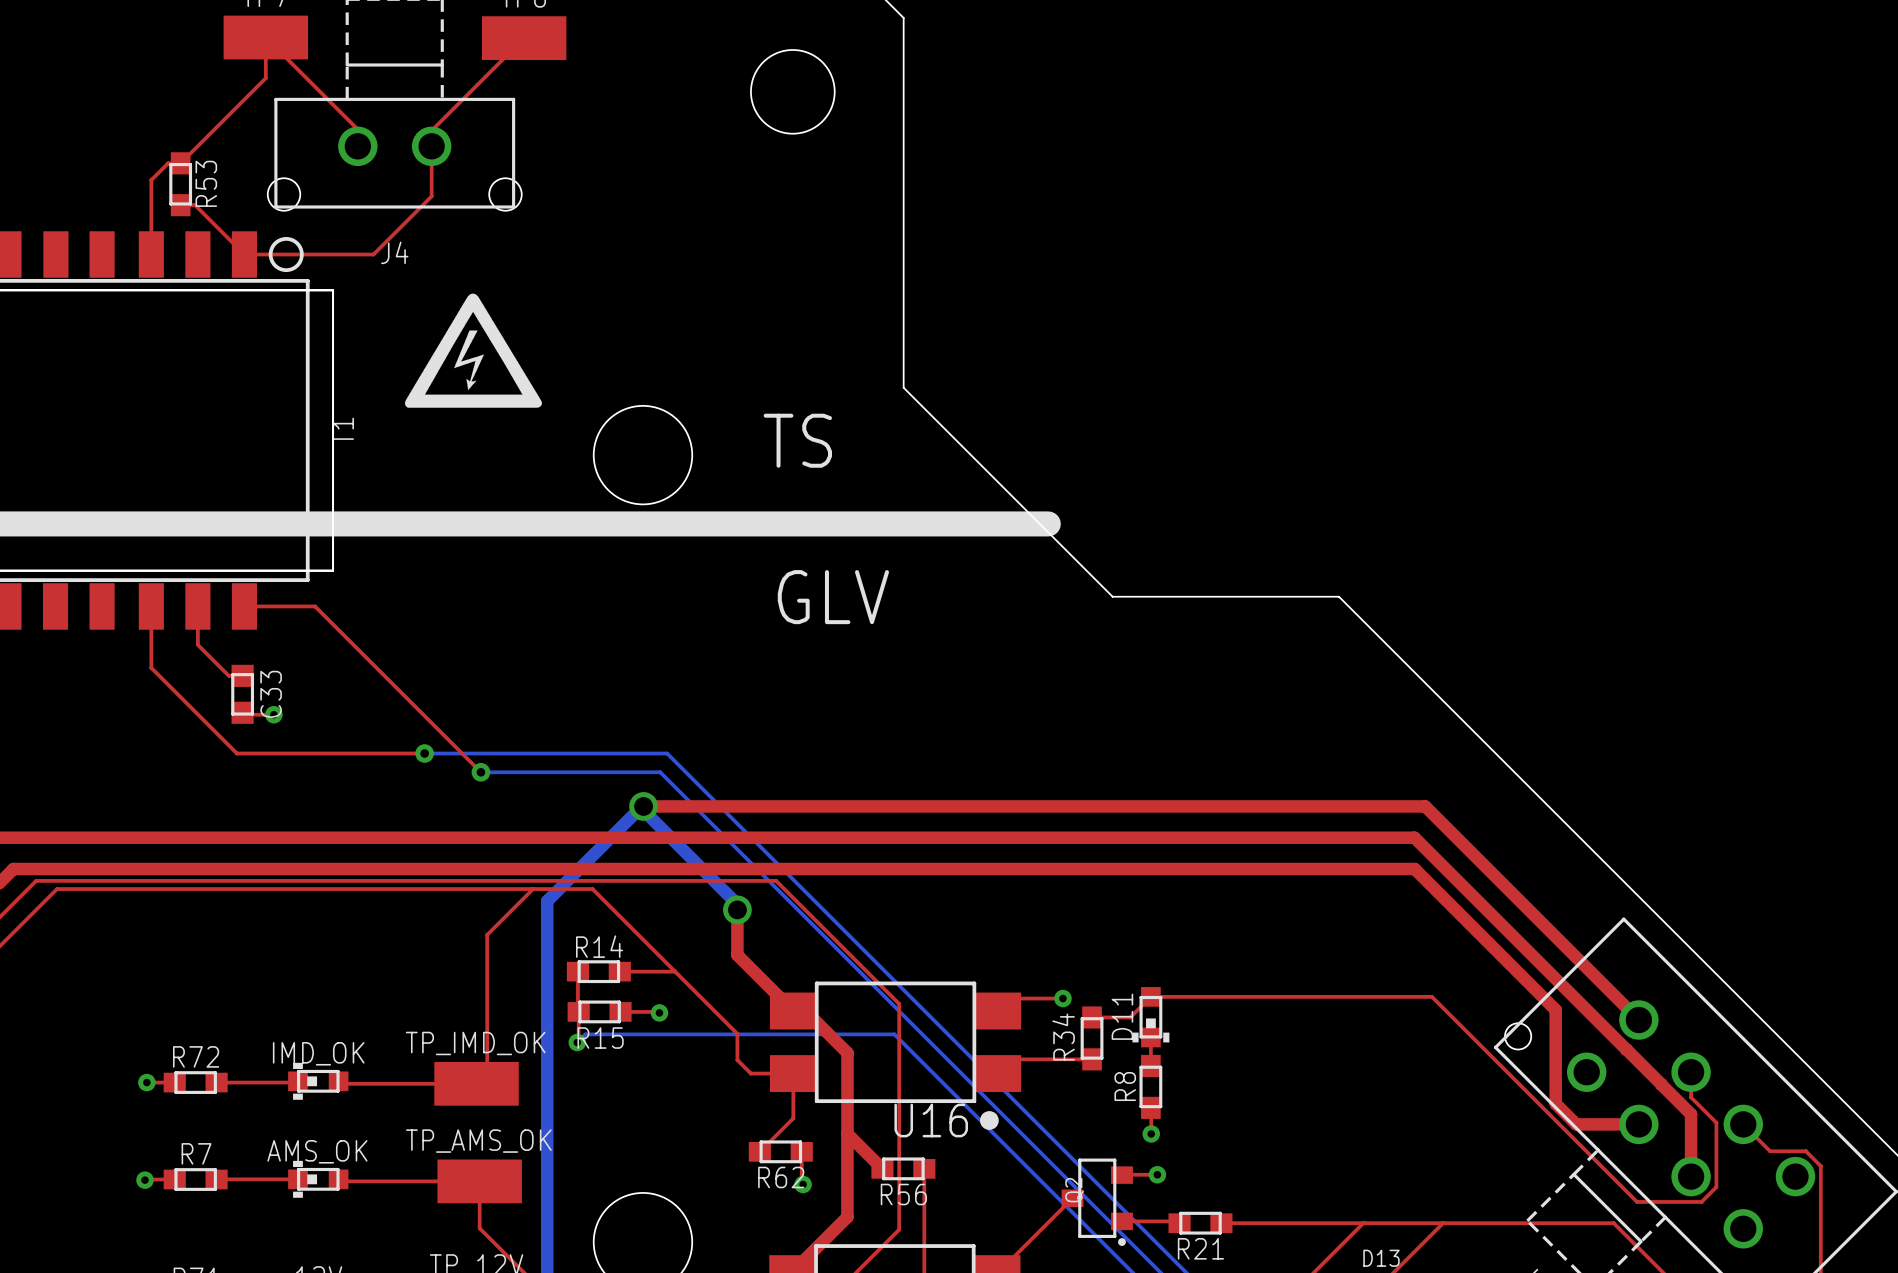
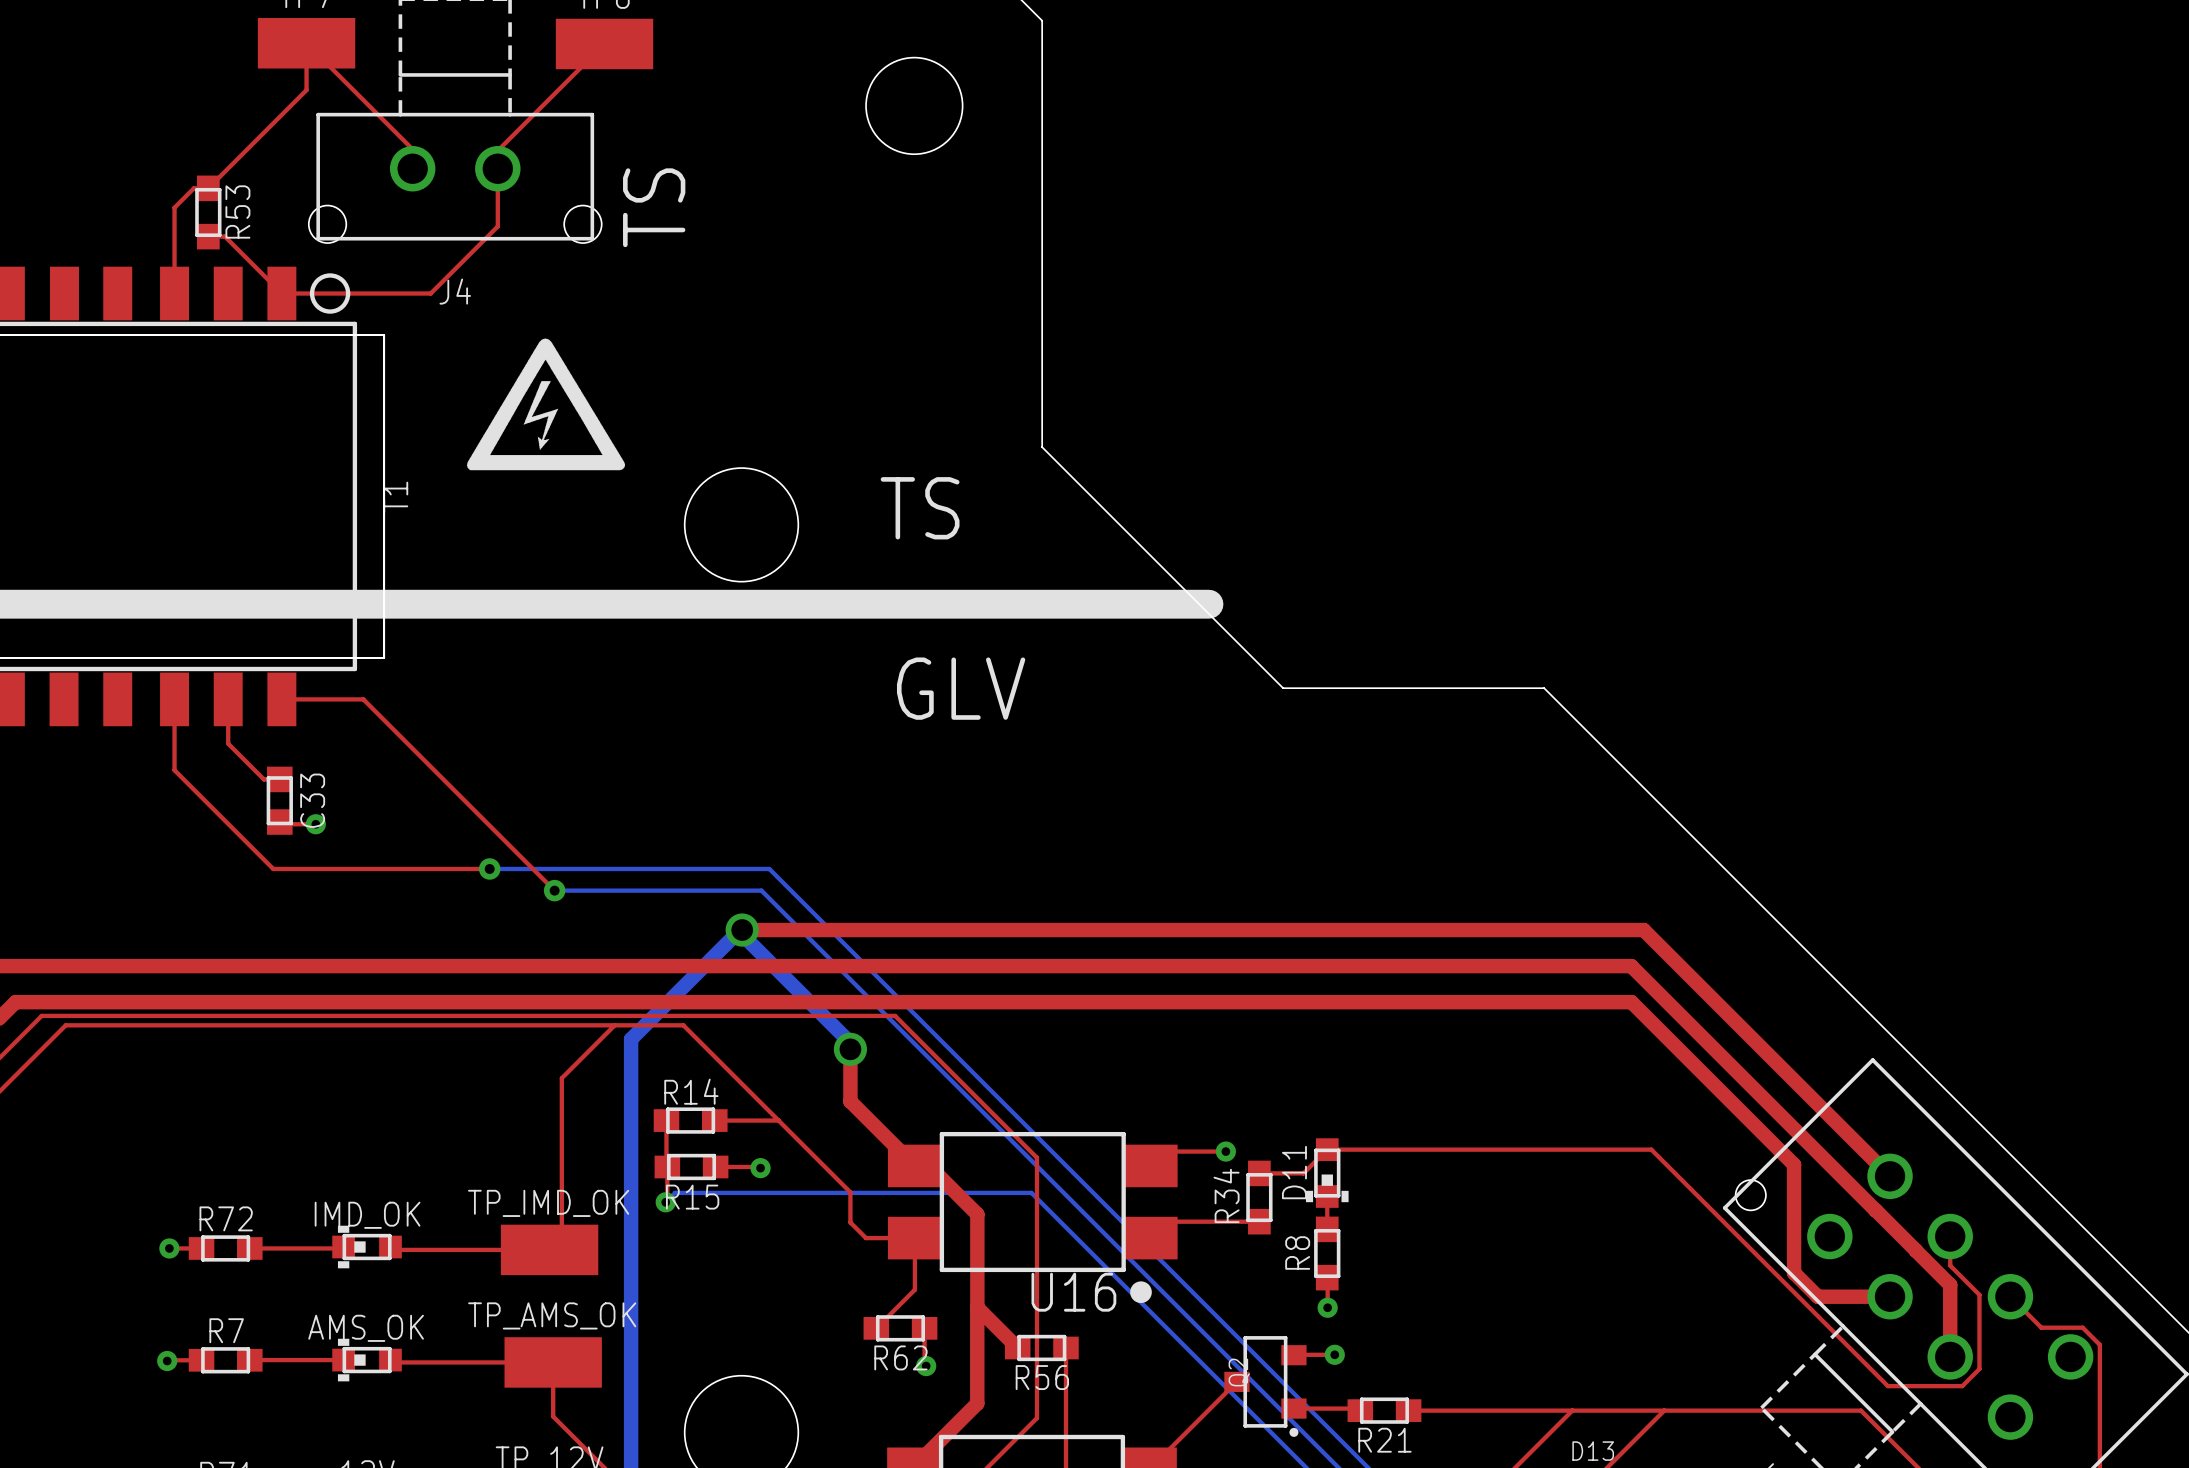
drawing: none -> [623, 168, 686, 248]

